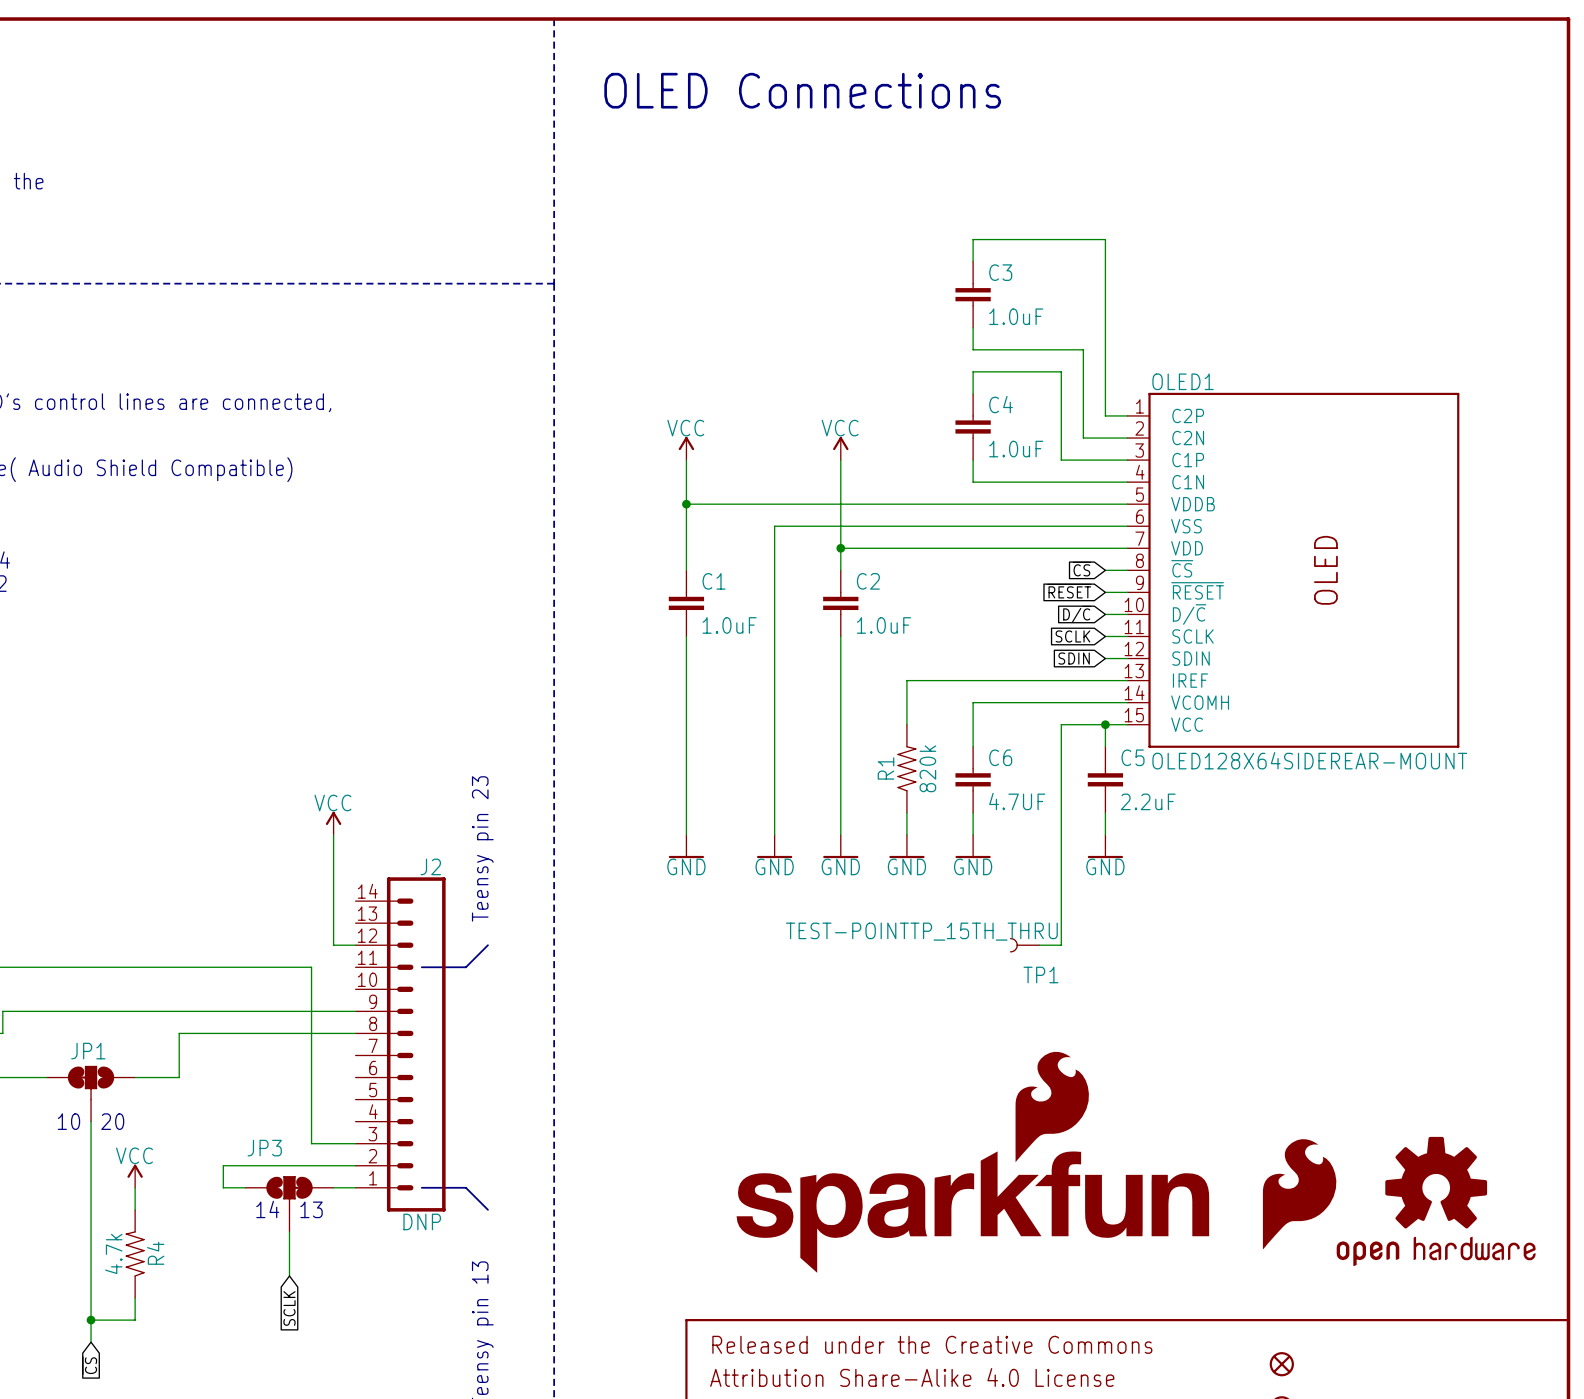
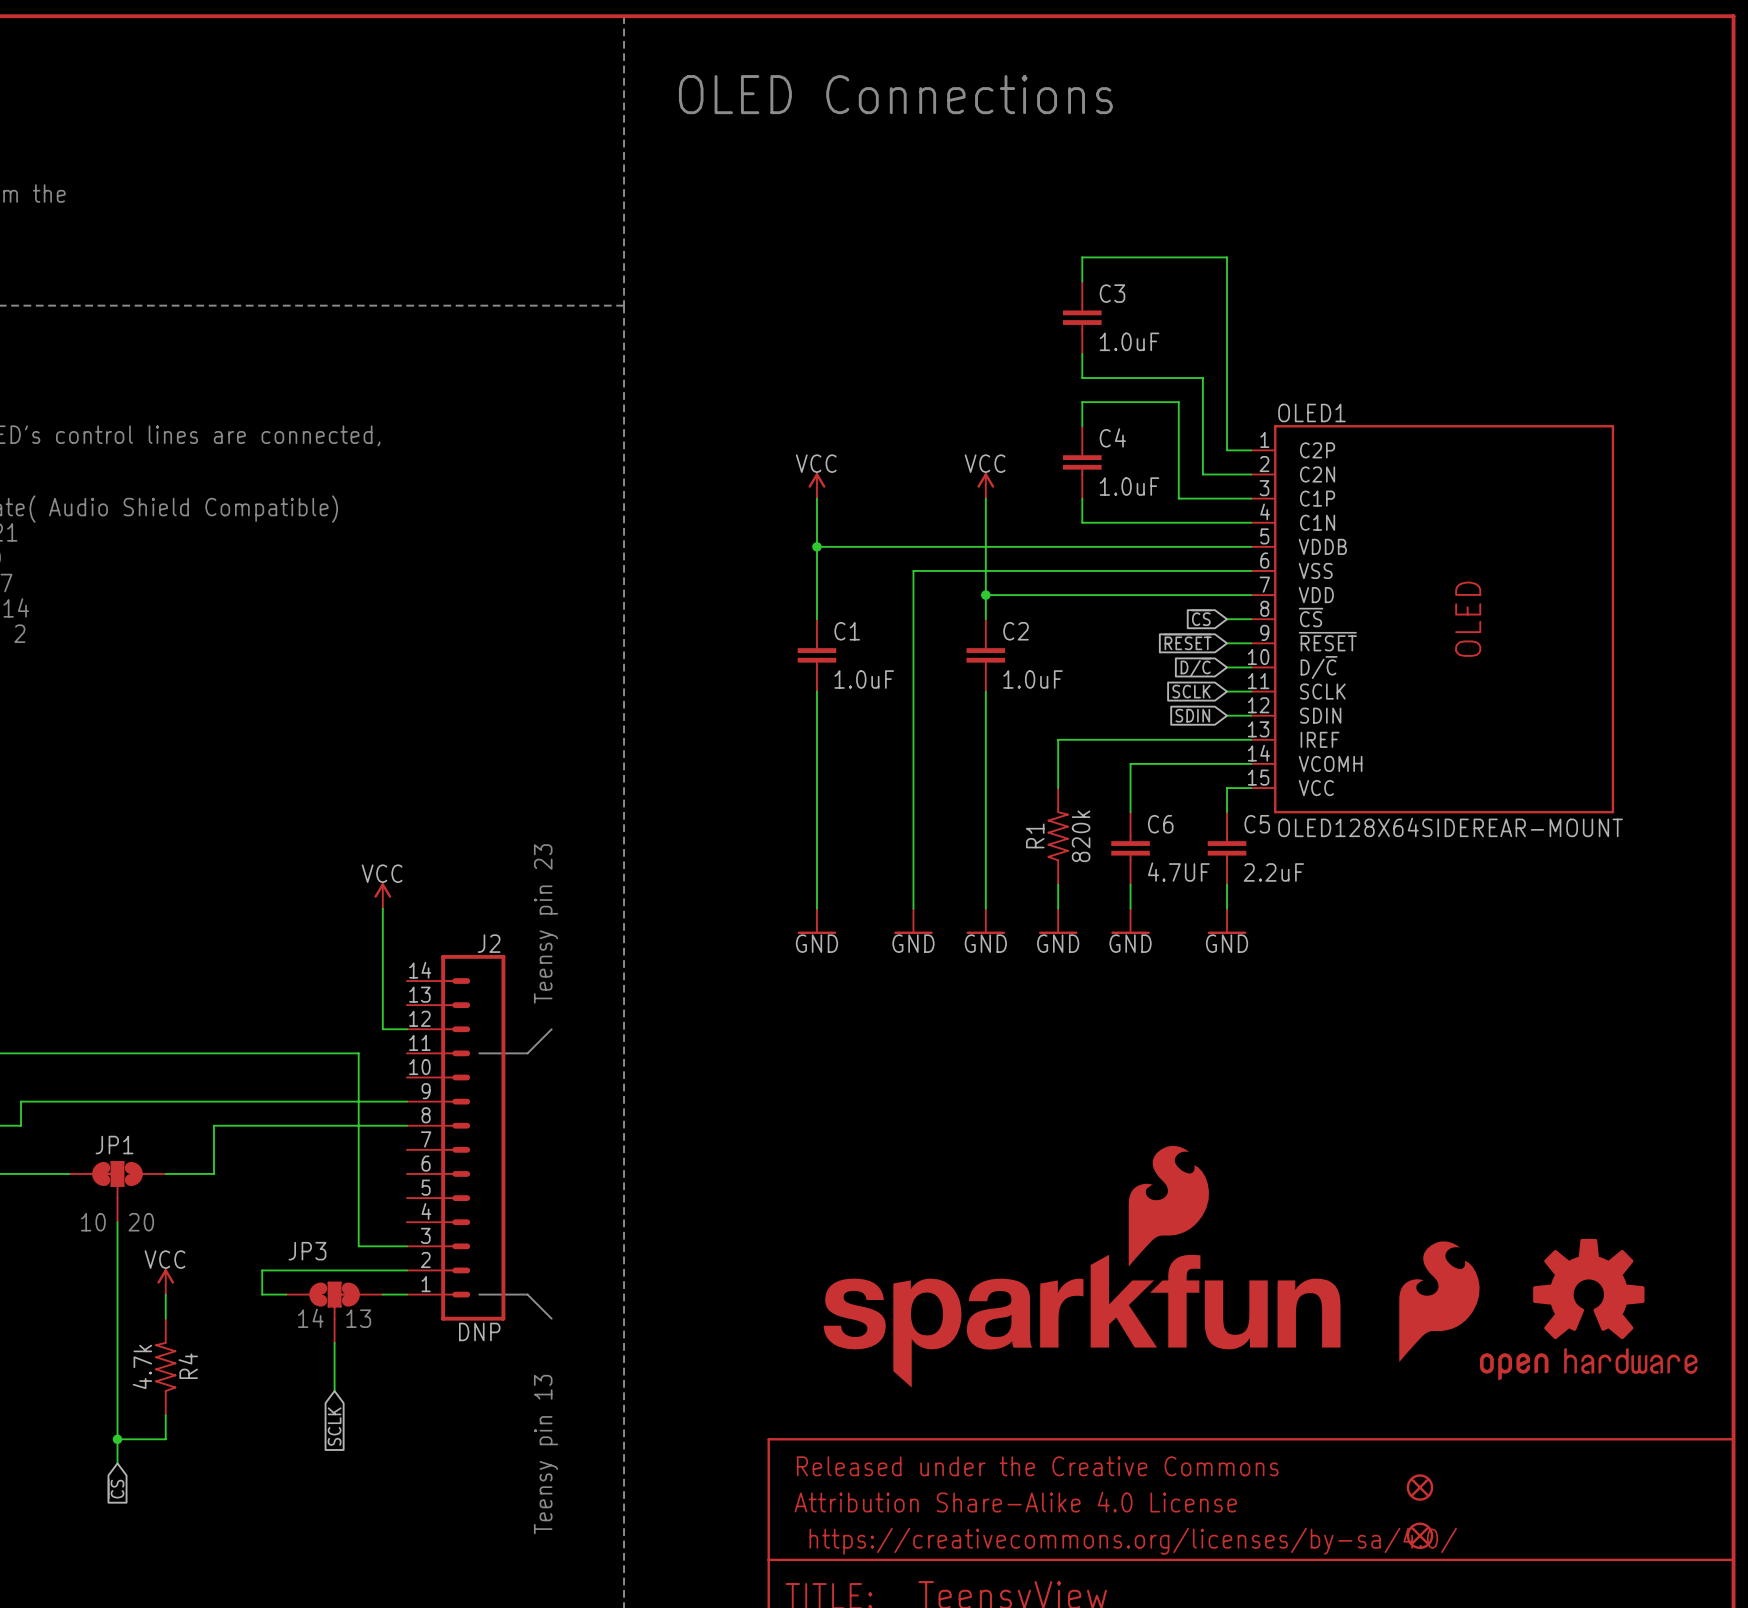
power symbol position: VCC (686, 448) -> VCC (816, 485)
power symbol position: VCC (840, 448) -> VCC (985, 485)
wire: (686, 460) (686, 570) -> (816, 498) (816, 619)
wire: (840, 460) (840, 570) -> (985, 498) (985, 619)
wire: (686, 504) (730, 504) -> none
junction position: (686, 504) -> (816, 546)
wire: (818, 526) (774, 526) (774, 834) -> (913, 570) (913, 908)
wire: (840, 548) (884, 548) -> none
junction position: (840, 548) -> (985, 595)
C1 position: (686, 603) -> (816, 655)
C2 position: (840, 603) -> (985, 655)
wire: (686, 636) (686, 834) -> (816, 691) (816, 908)
wire: (840, 636) (840, 834) -> (985, 691) (985, 908)
wire: (951, 680) (906, 680) (906, 724) -> (1058, 739) (1058, 788)
wire: (1017, 702) (973, 702) (973, 746) -> (1130, 763) (1130, 812)
wire: (1105, 724) (1061, 724) (1061, 945) (1039, 945) -> none
junction: (1105, 724) -> none
R1 position: (906, 768) -> (1058, 836)
C6 position: (973, 779) -> (1130, 848)
wire: (906, 812) (906, 834) -> (1058, 884) (1058, 908)
wire: (973, 812) (973, 834) -> (1130, 884) (1130, 908)
power symbol: GND (686, 846) -> none
power symbol: none -> GND (816, 921)
power symbol: GND (774, 846) -> none
power symbol: none -> GND (913, 921)
power symbol: GND (840, 846) -> none
power symbol: none -> GND (985, 921)
power symbol: GND (906, 846) -> none
power symbol: none -> GND (1058, 921)
power symbol: GND (973, 846) -> none
power symbol: none -> GND (1130, 921)
TP1: TEST-POINTTP_15TH_THRU (1024, 945) -> none

